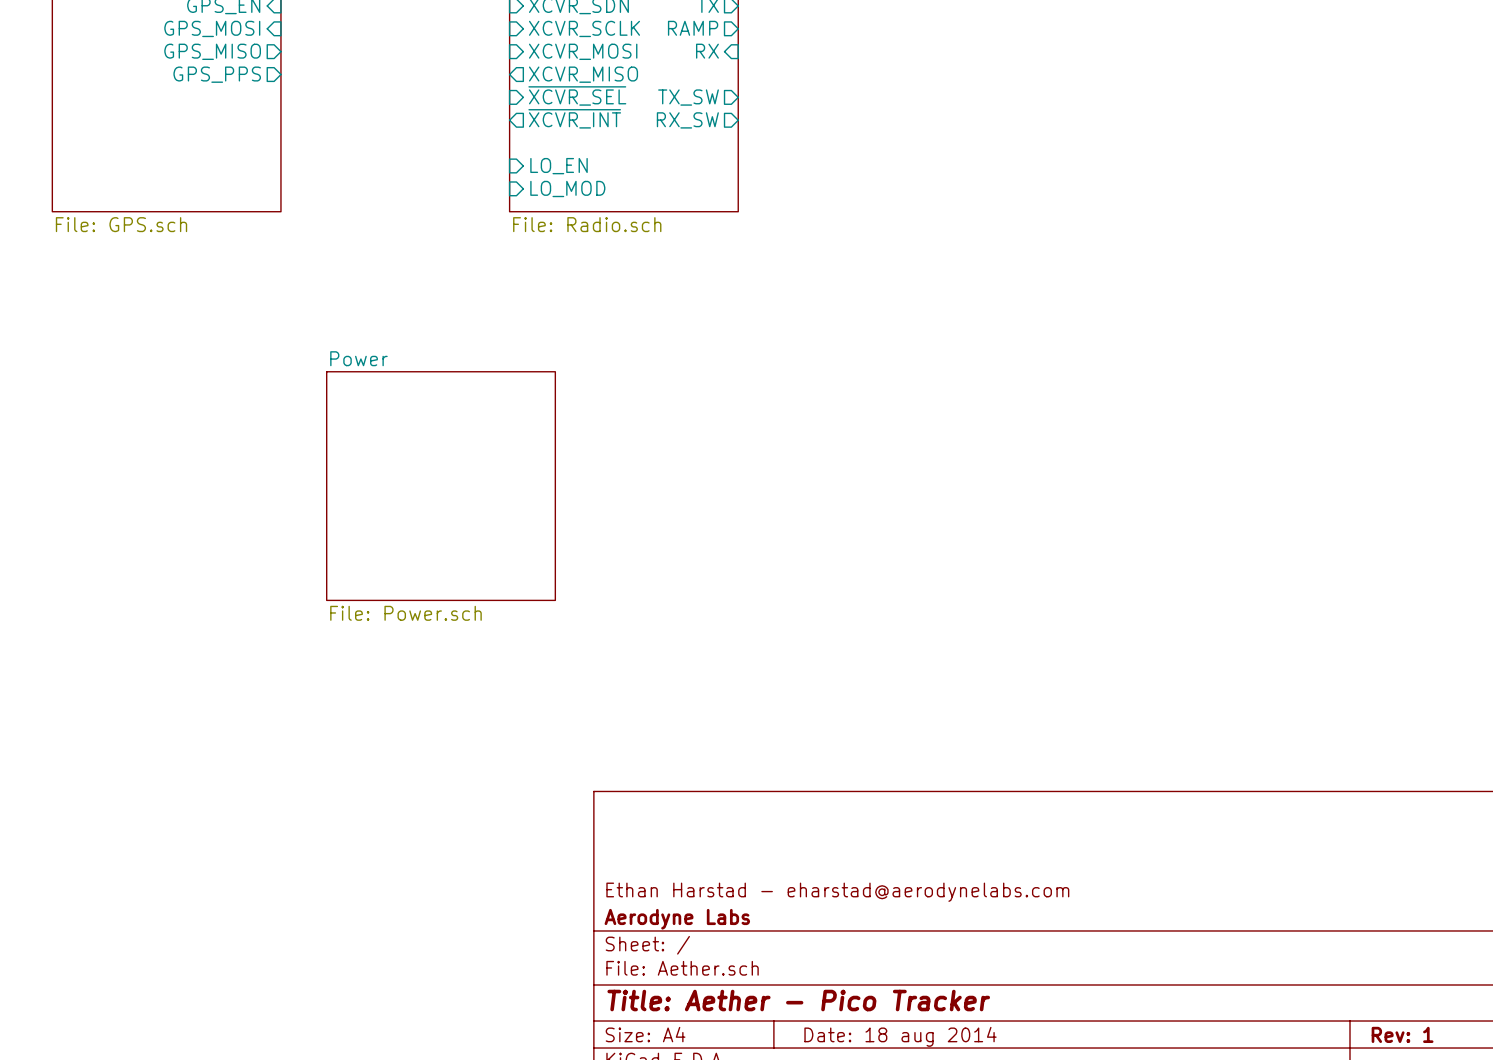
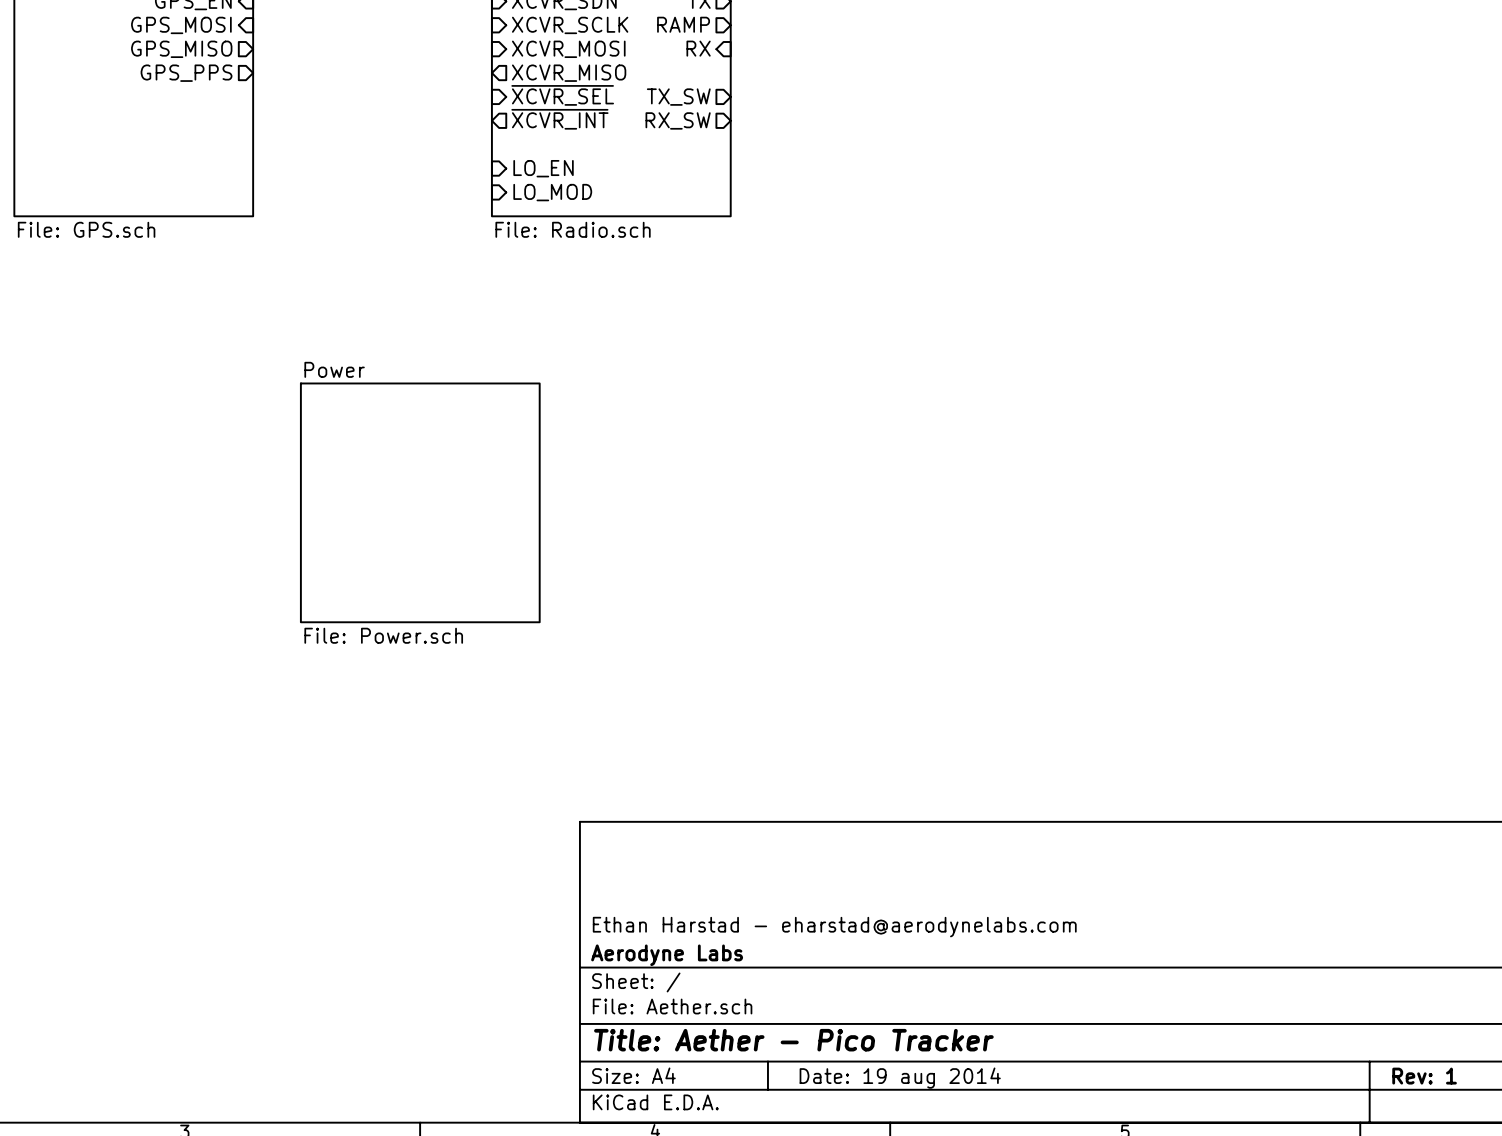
title block: Date: 18 aug 2014 (900, 1036) -> Date: 19 aug 2014 (900, 1078)

